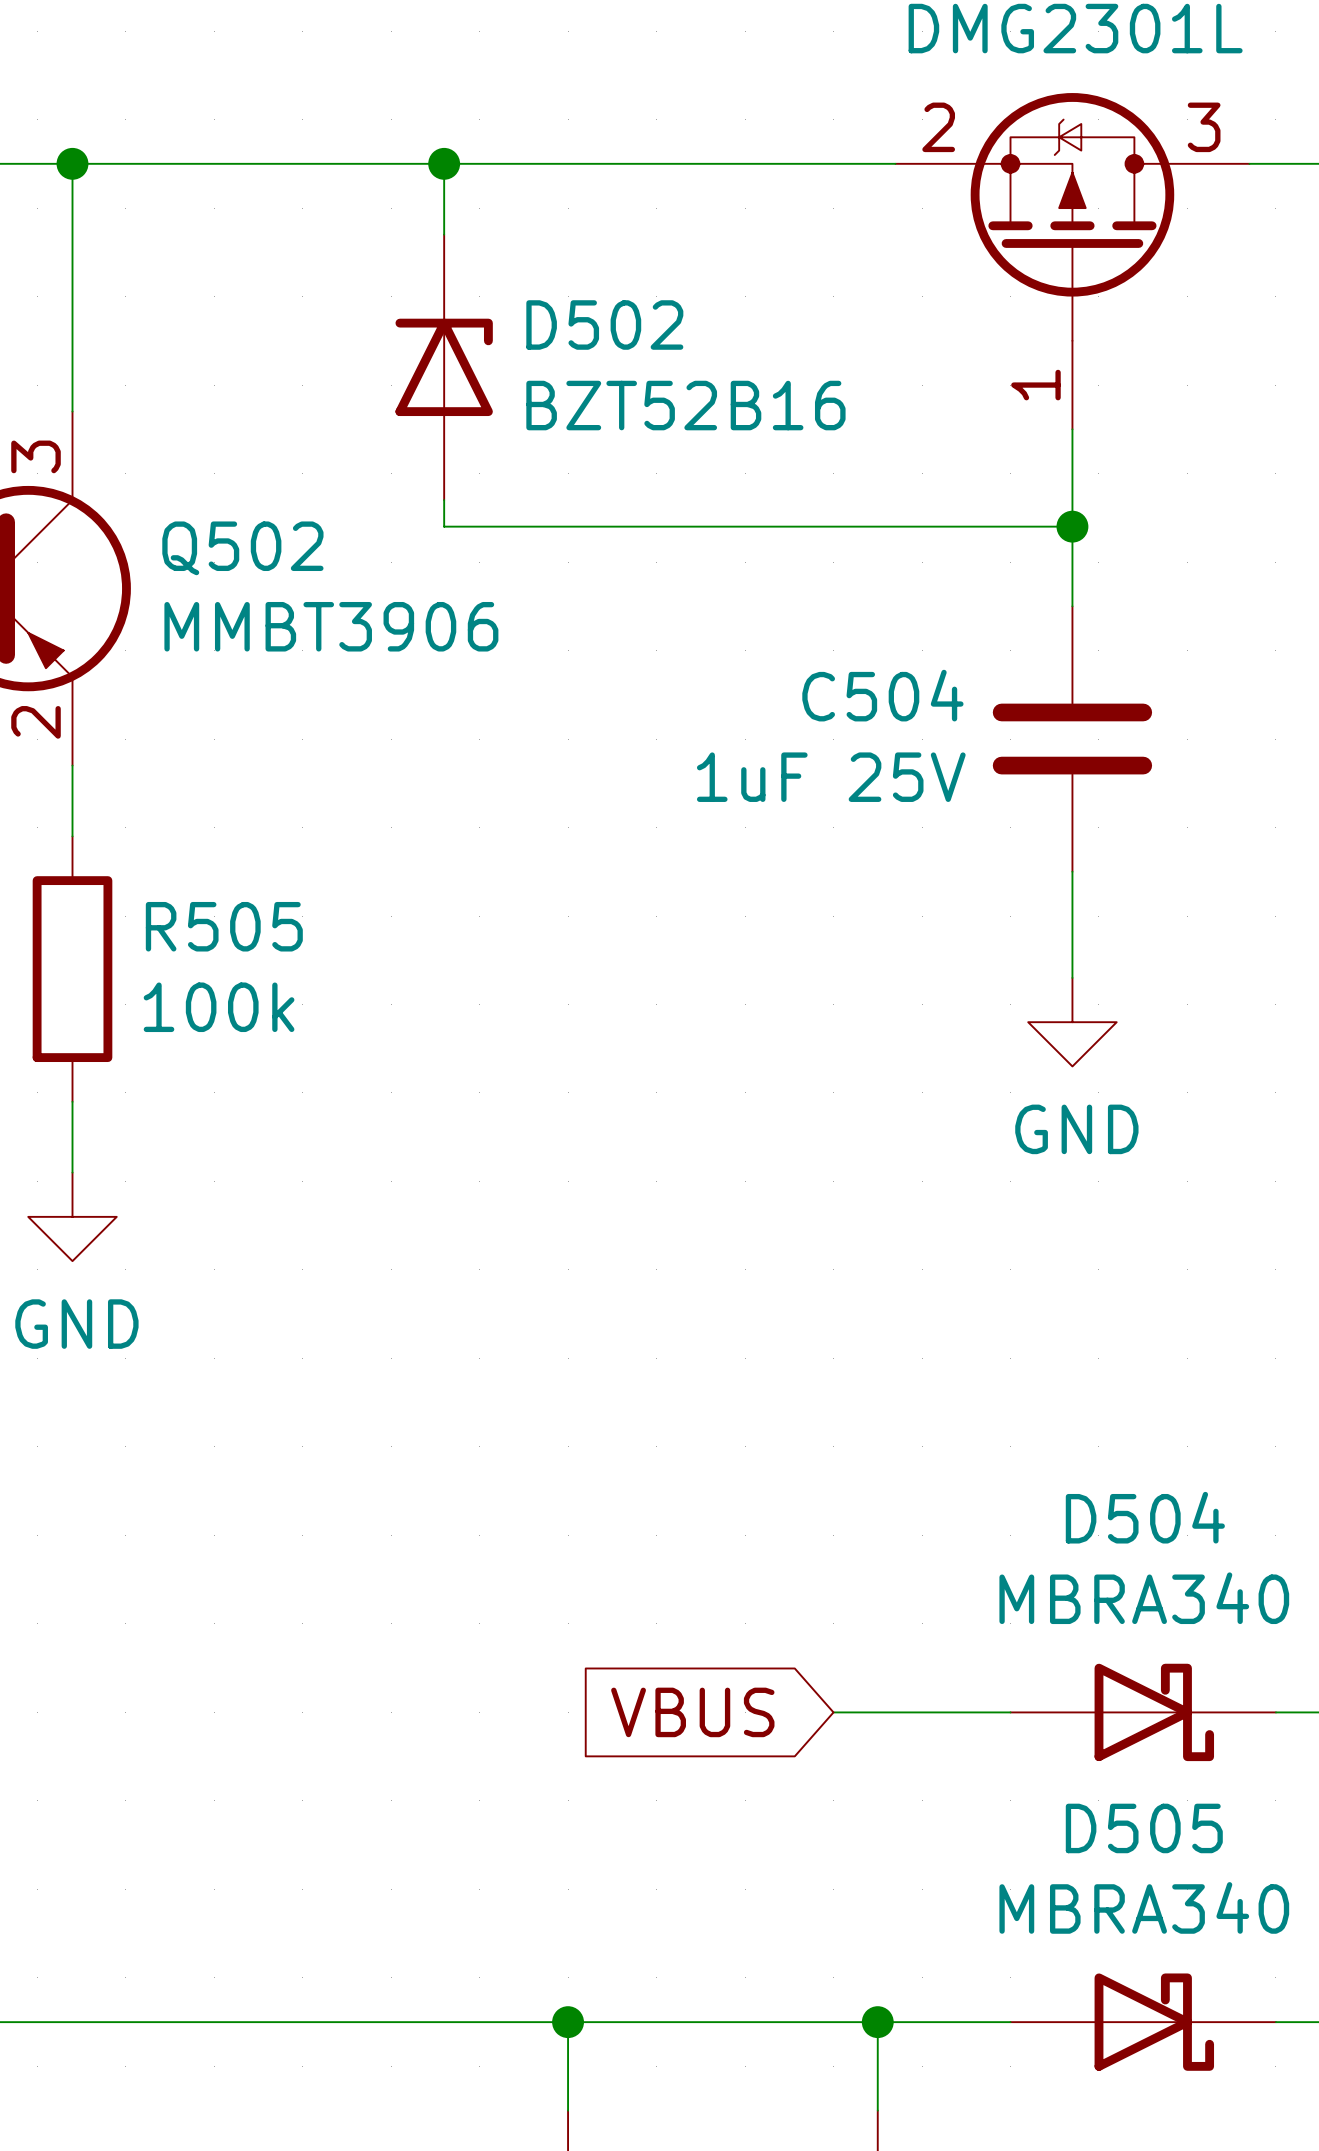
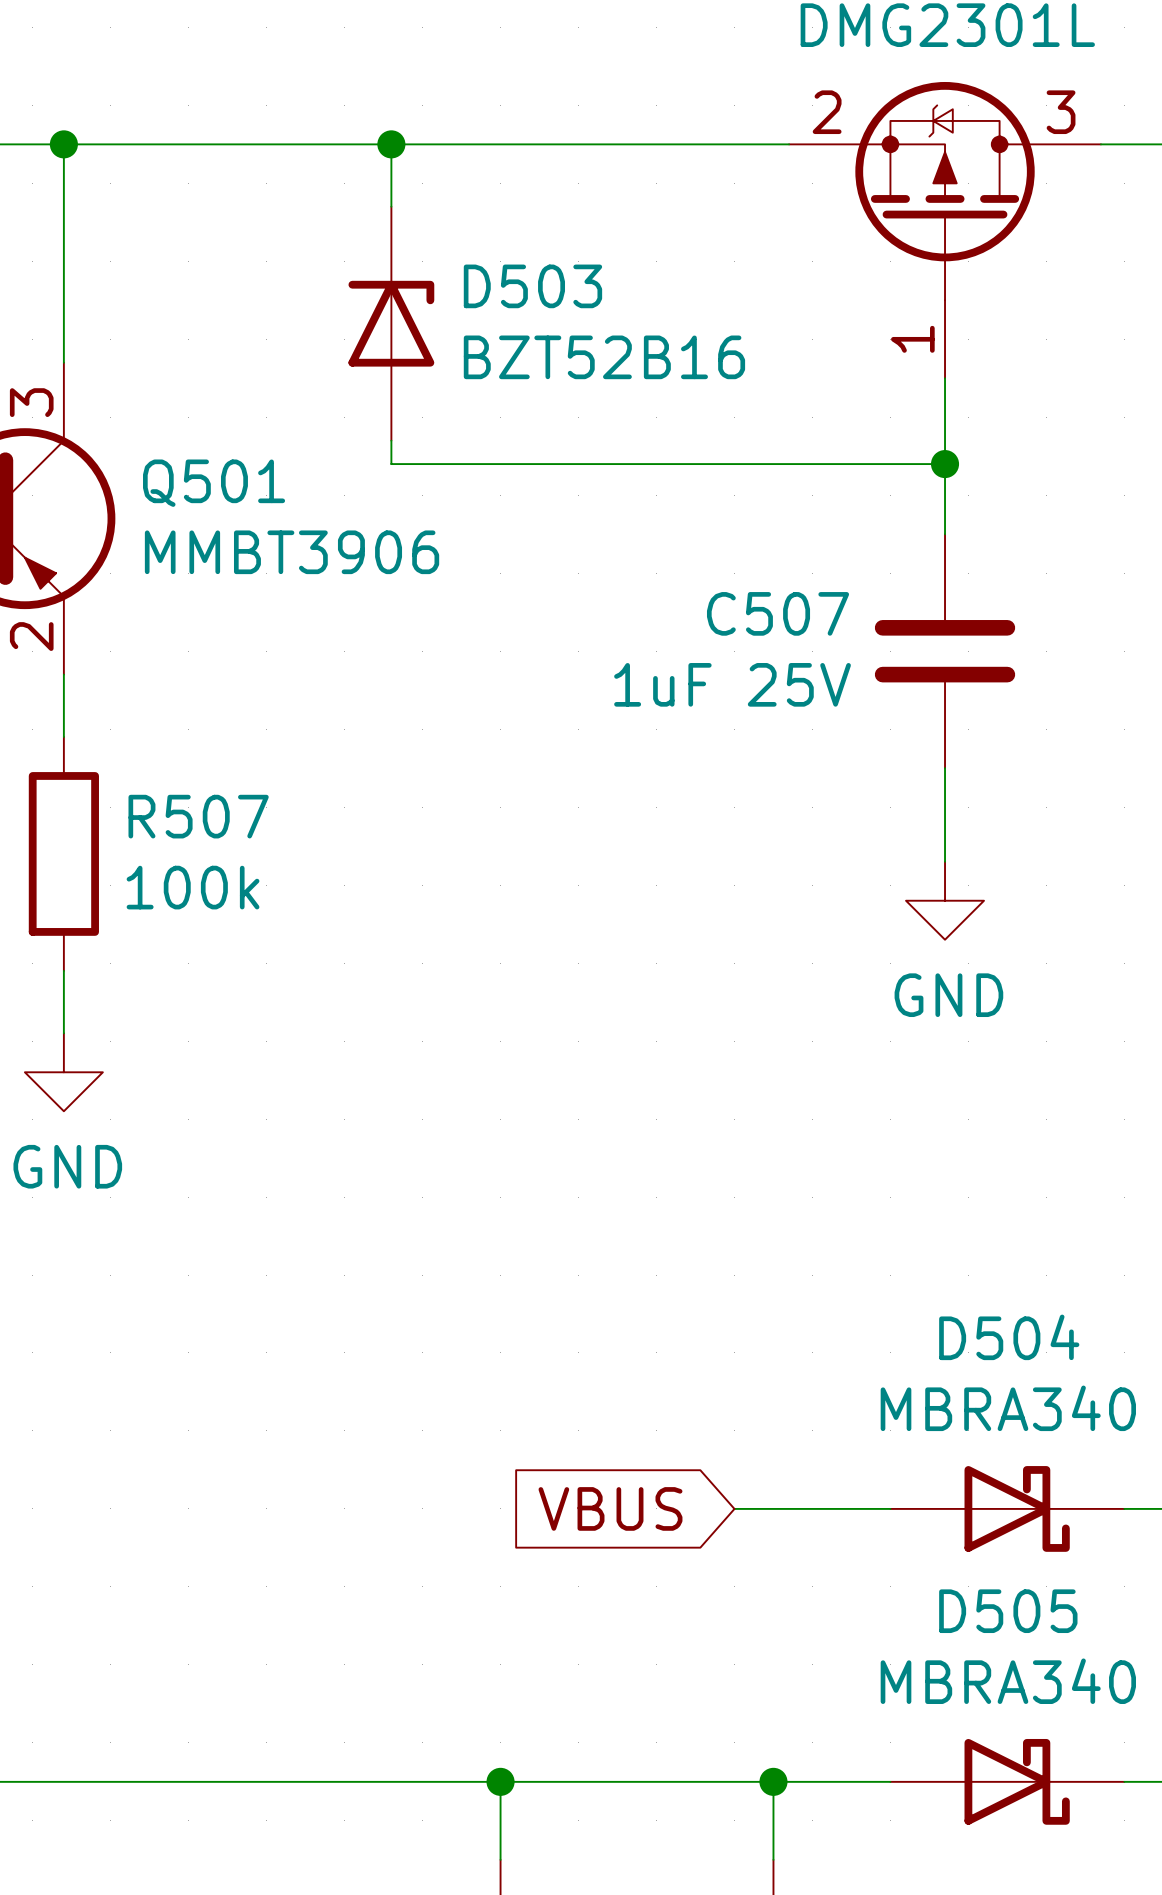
D502 name: D502 (604, 325) -> D503 (532, 286)
Q502 name: Q502 (242, 548) -> Q501 (214, 483)
C504 name: C504 (882, 695) -> C507 (778, 613)
R505 name: R505 (224, 926) -> R507 (198, 816)

